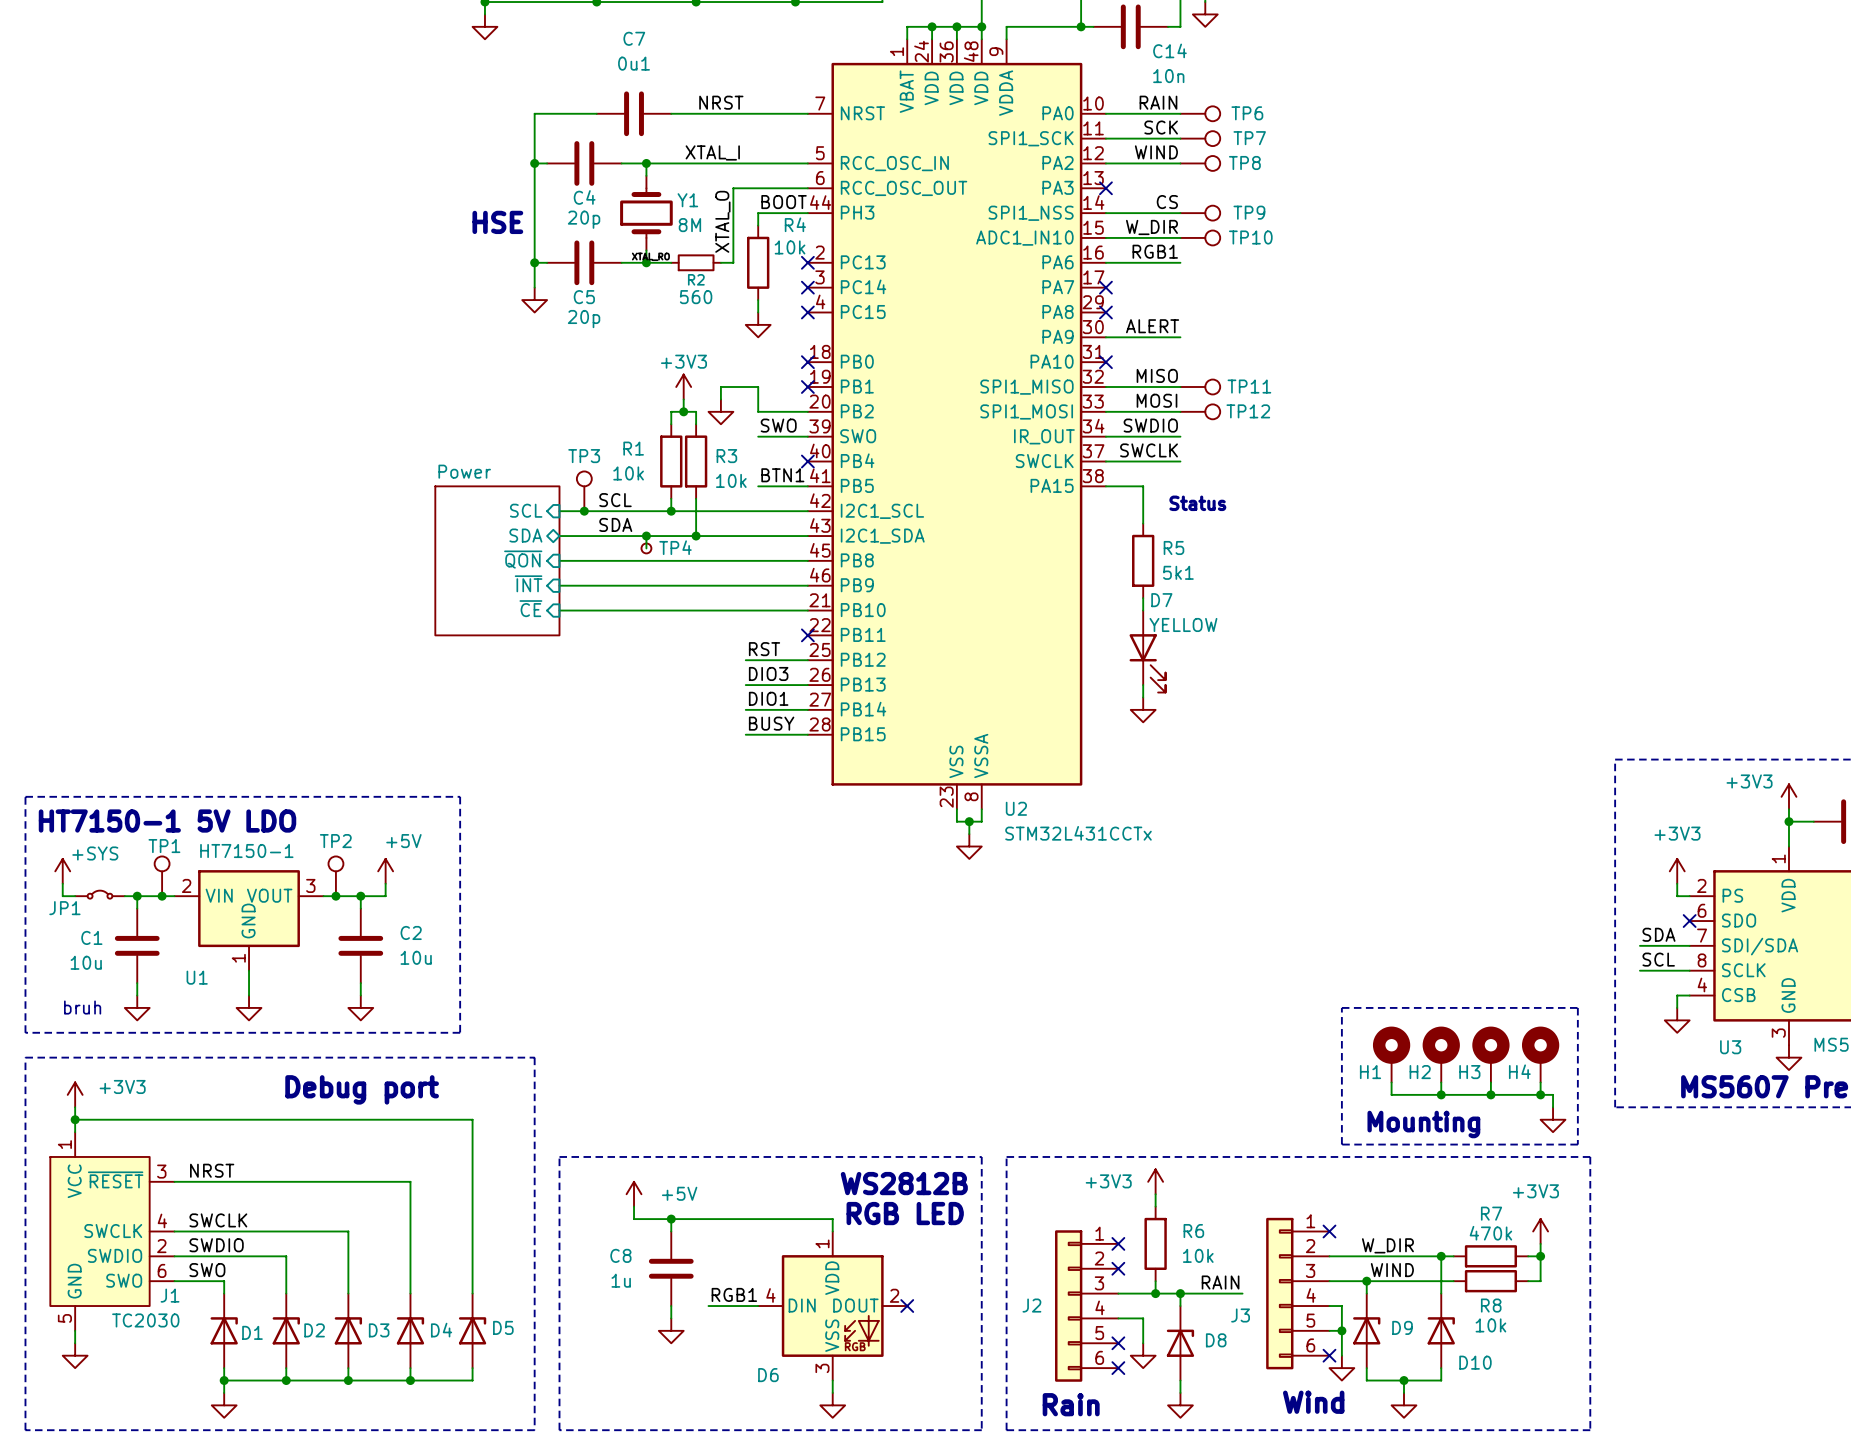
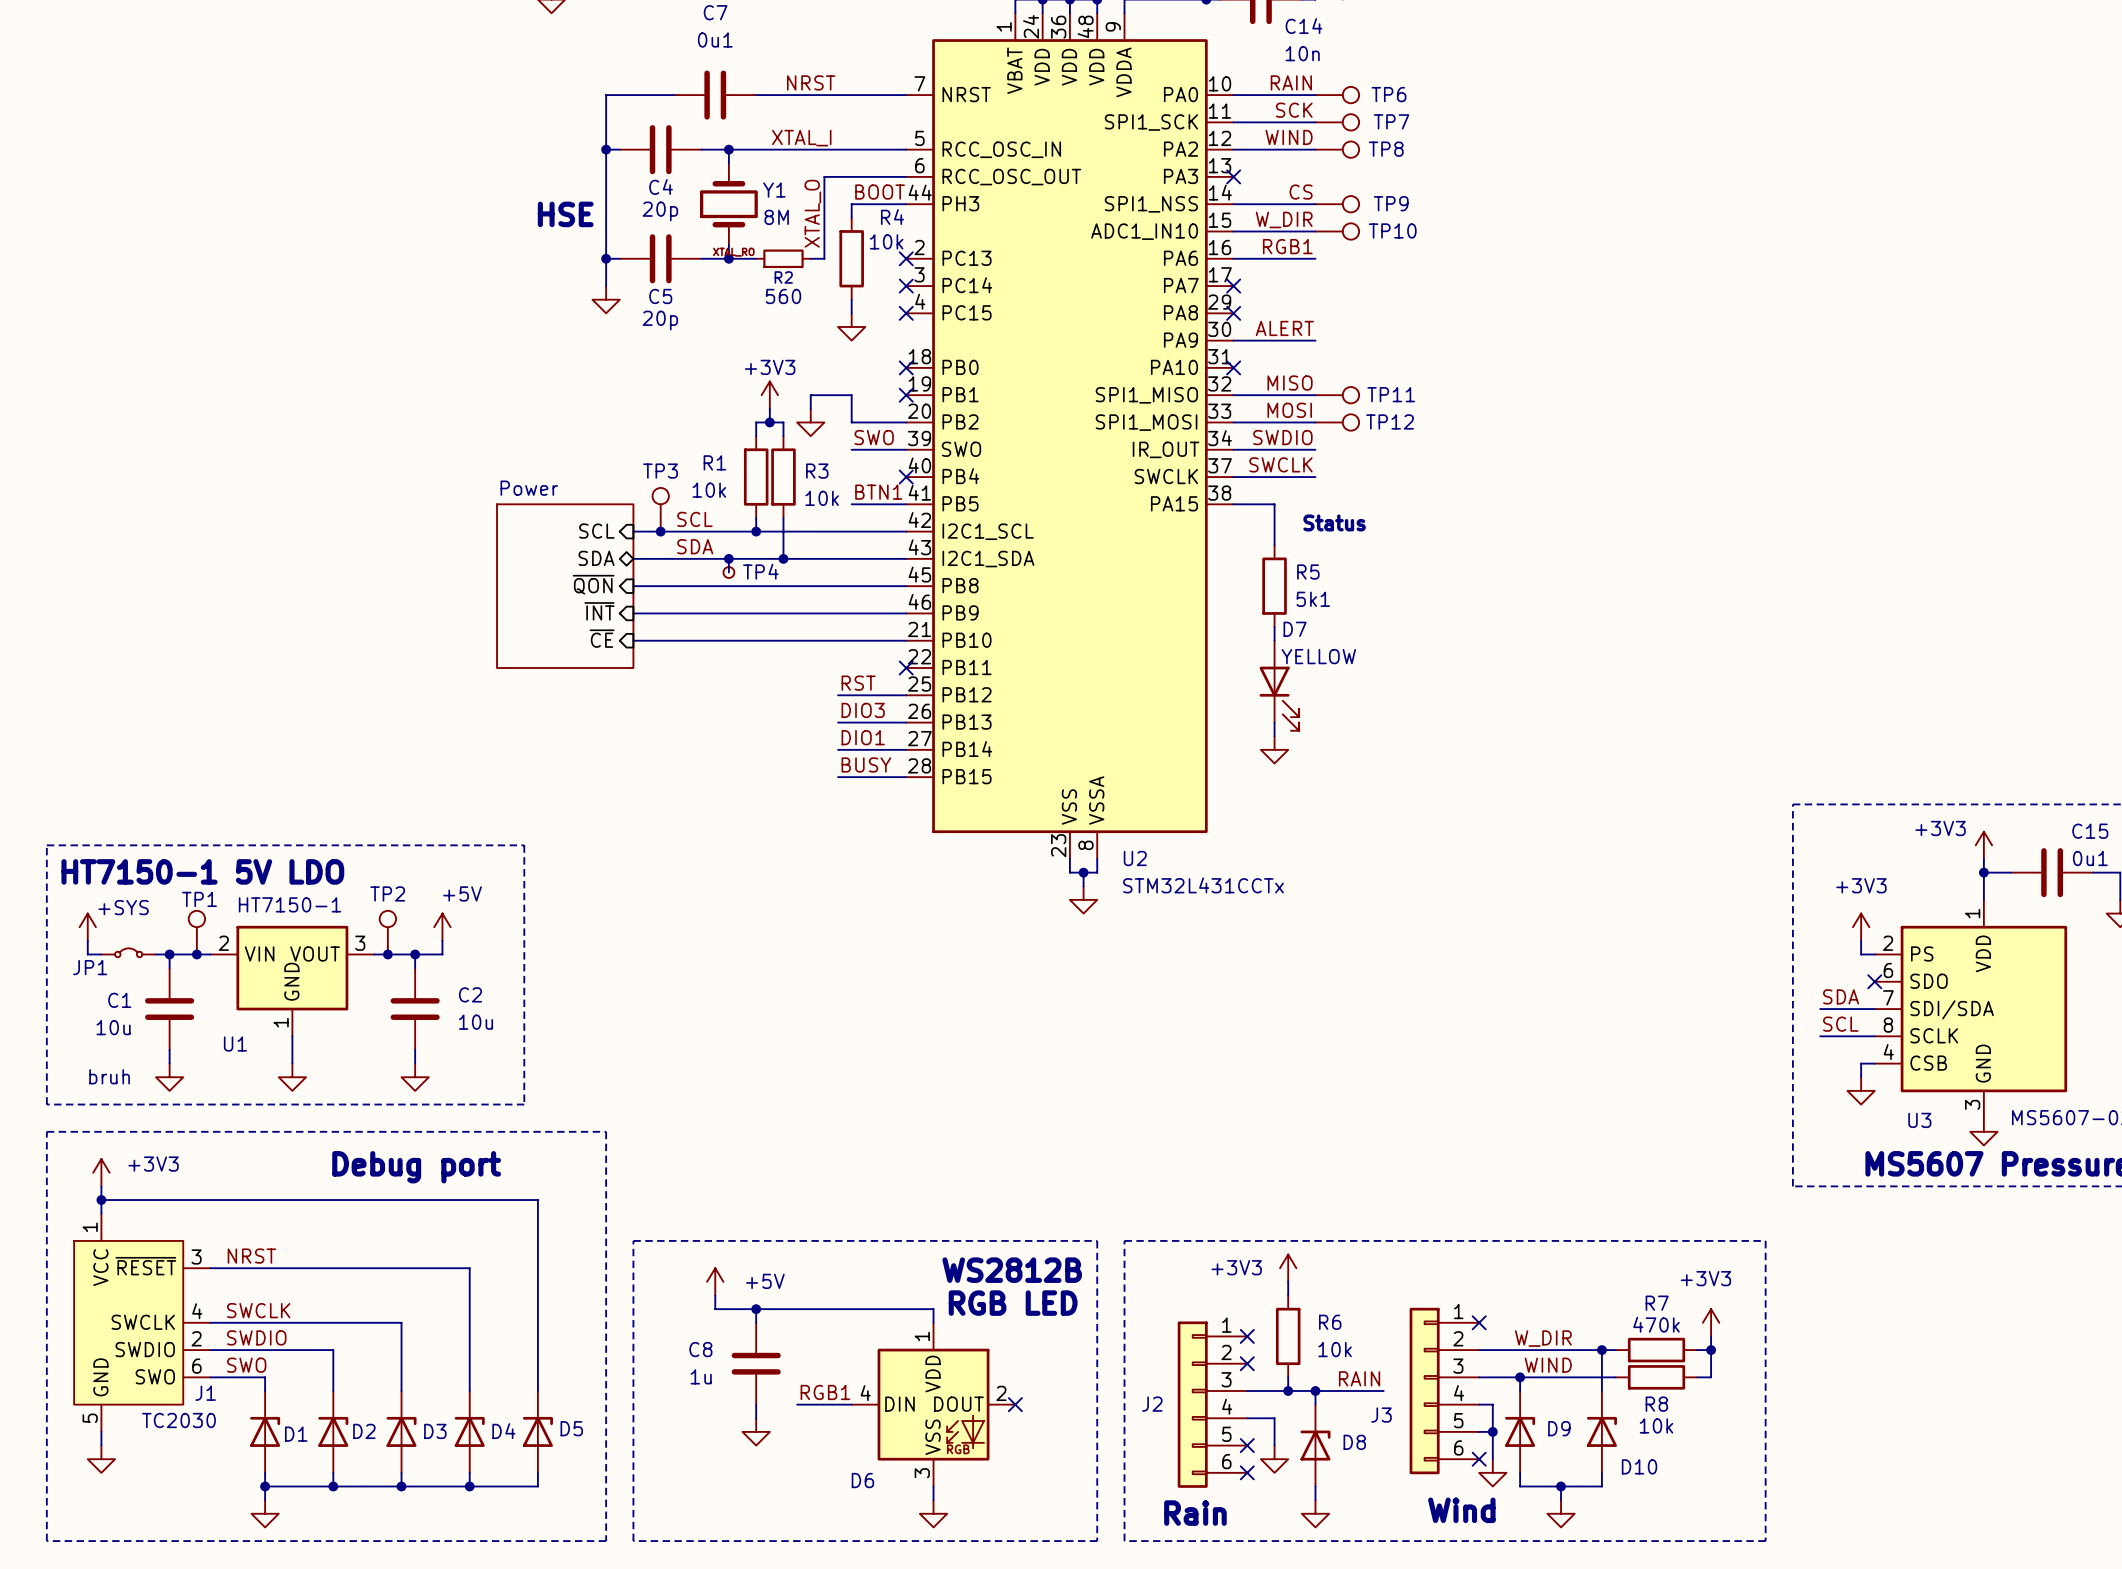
line: (1341, 1007) (1577, 1007) (1577, 1144) (1341, 1144) (1341, 1007) -> none
H1: (1391, 1054) -> none
H2: (1441, 1054) -> none
H3: (1490, 1054) -> none
H4: (1540, 1054) -> none
wire: (1391, 1082) (1391, 1094) (1553, 1094) (1553, 1107) -> none
wire: (1441, 1082) (1441, 1094) -> none
wire: (1490, 1082) (1490, 1094) -> none
wire: (1540, 1082) (1540, 1094) -> none
junction: (1441, 1094) -> none
junction: (1490, 1094) -> none
junction: (1540, 1094) -> none
power symbol: (1553, 1119) -> none
text: Mounting (1423, 1124) -> none

